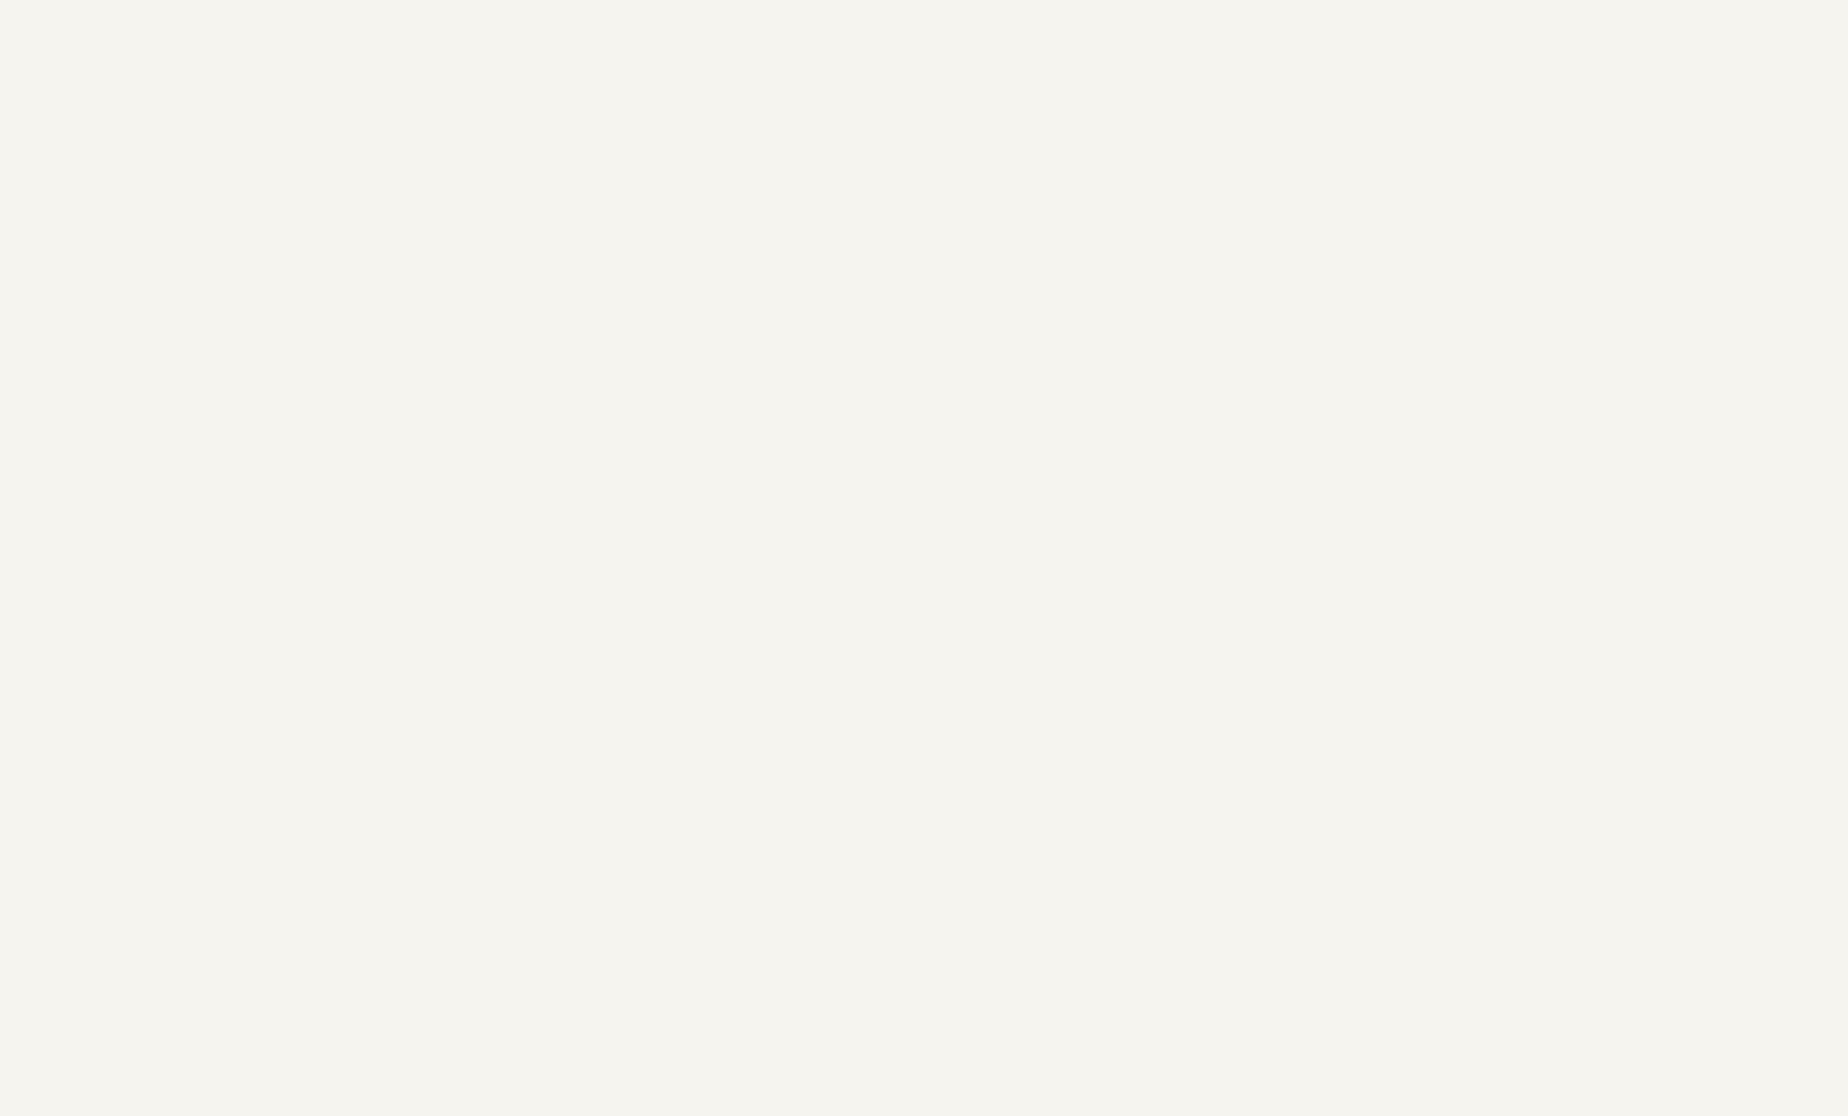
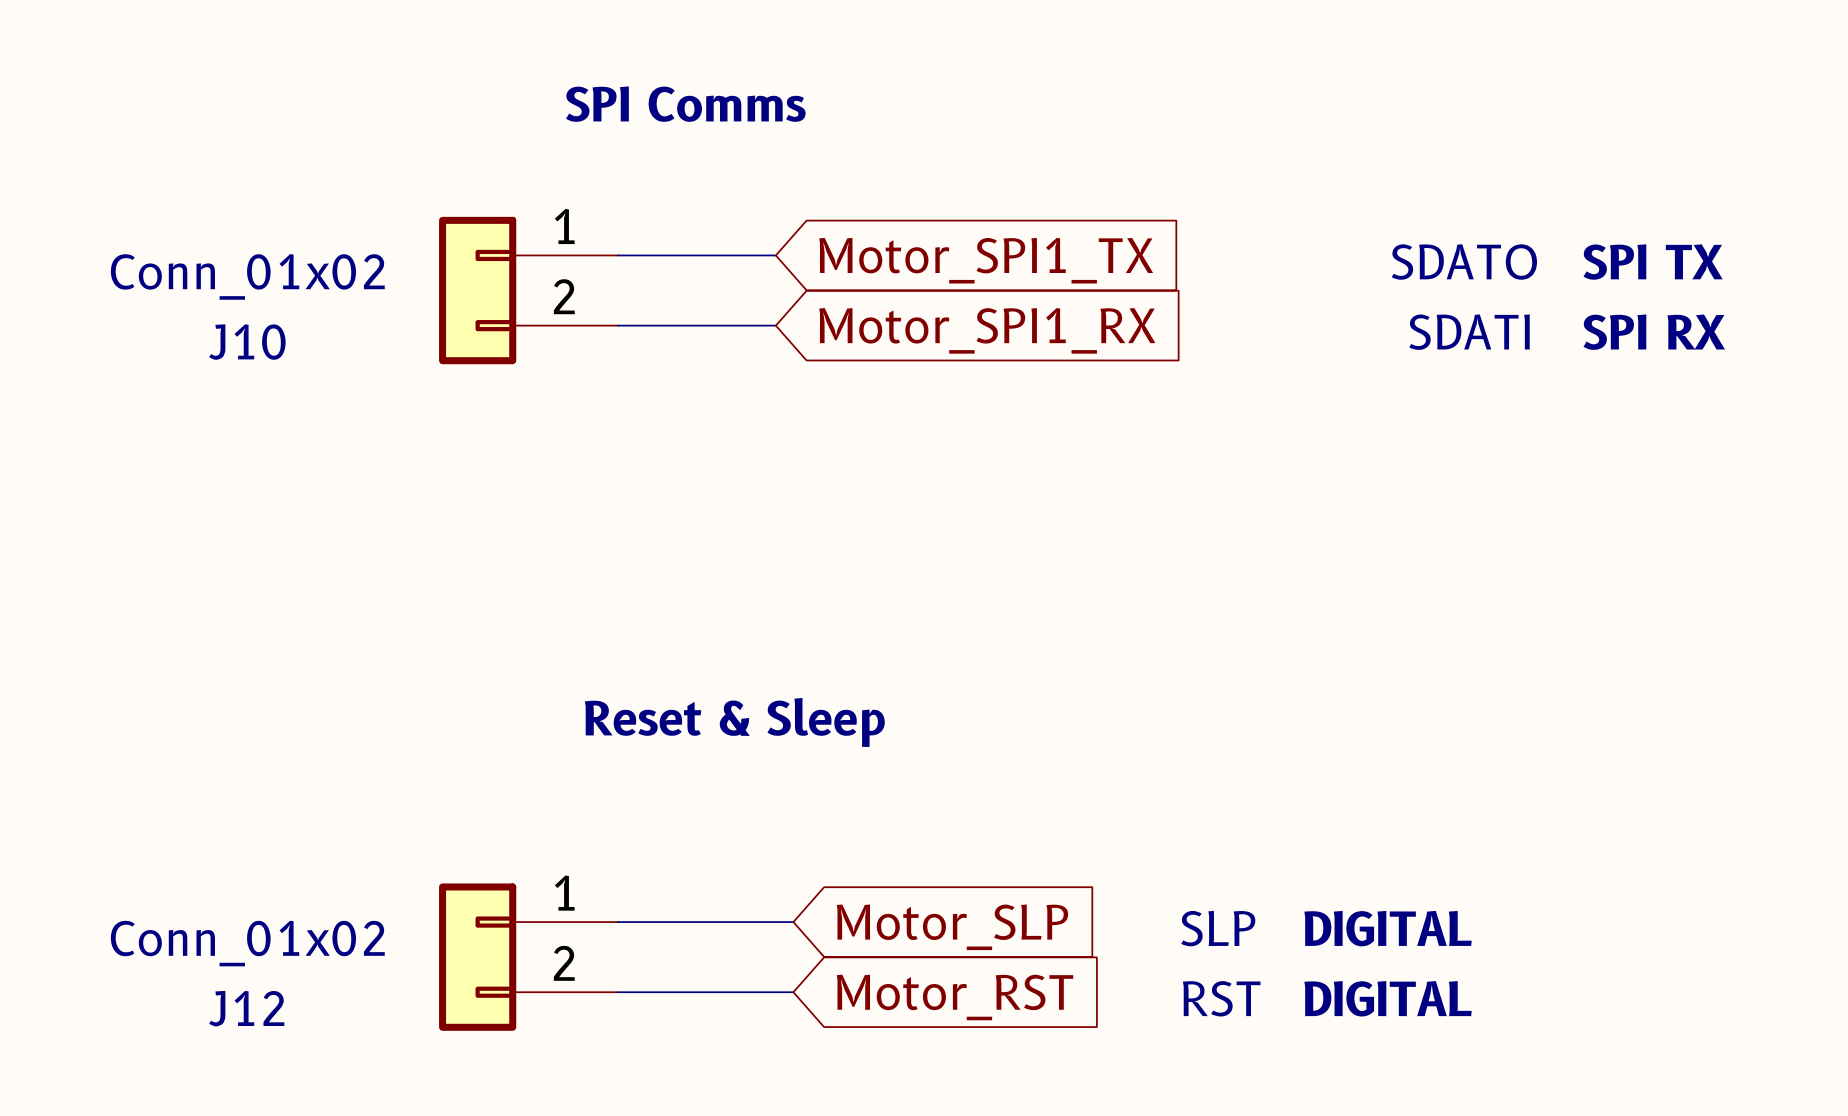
text: none -> SPI Comms (685, 104)
wire: none -> (617, 255) (775, 255)
global label: none -> Motor_SPI1_TX (986, 260)
text: none -> SDATO (1464, 261)
text: none -> SPI TX (1653, 262)
J10: none -> Conn_01x02 (528, 290)
wire: none -> (617, 325) (775, 325)
global label: none -> Motor_SPI1_RX (987, 330)
text: none -> SDATI (1469, 332)
text: none -> SPI RX (1654, 332)
text: none -> Reset & Sleep (734, 722)
wire: none -> (617, 922) (793, 922)
global label: none -> Motor_SLP (952, 927)
text: none -> SLP (1218, 928)
text: none -> DIGITAL (1388, 928)
J12: none -> Conn_01x02 (528, 957)
wire: none -> (617, 992) (793, 992)
global label: none -> Motor_RST (955, 997)
text: none -> RST (1221, 998)
text: none -> DIGITAL (1388, 998)

